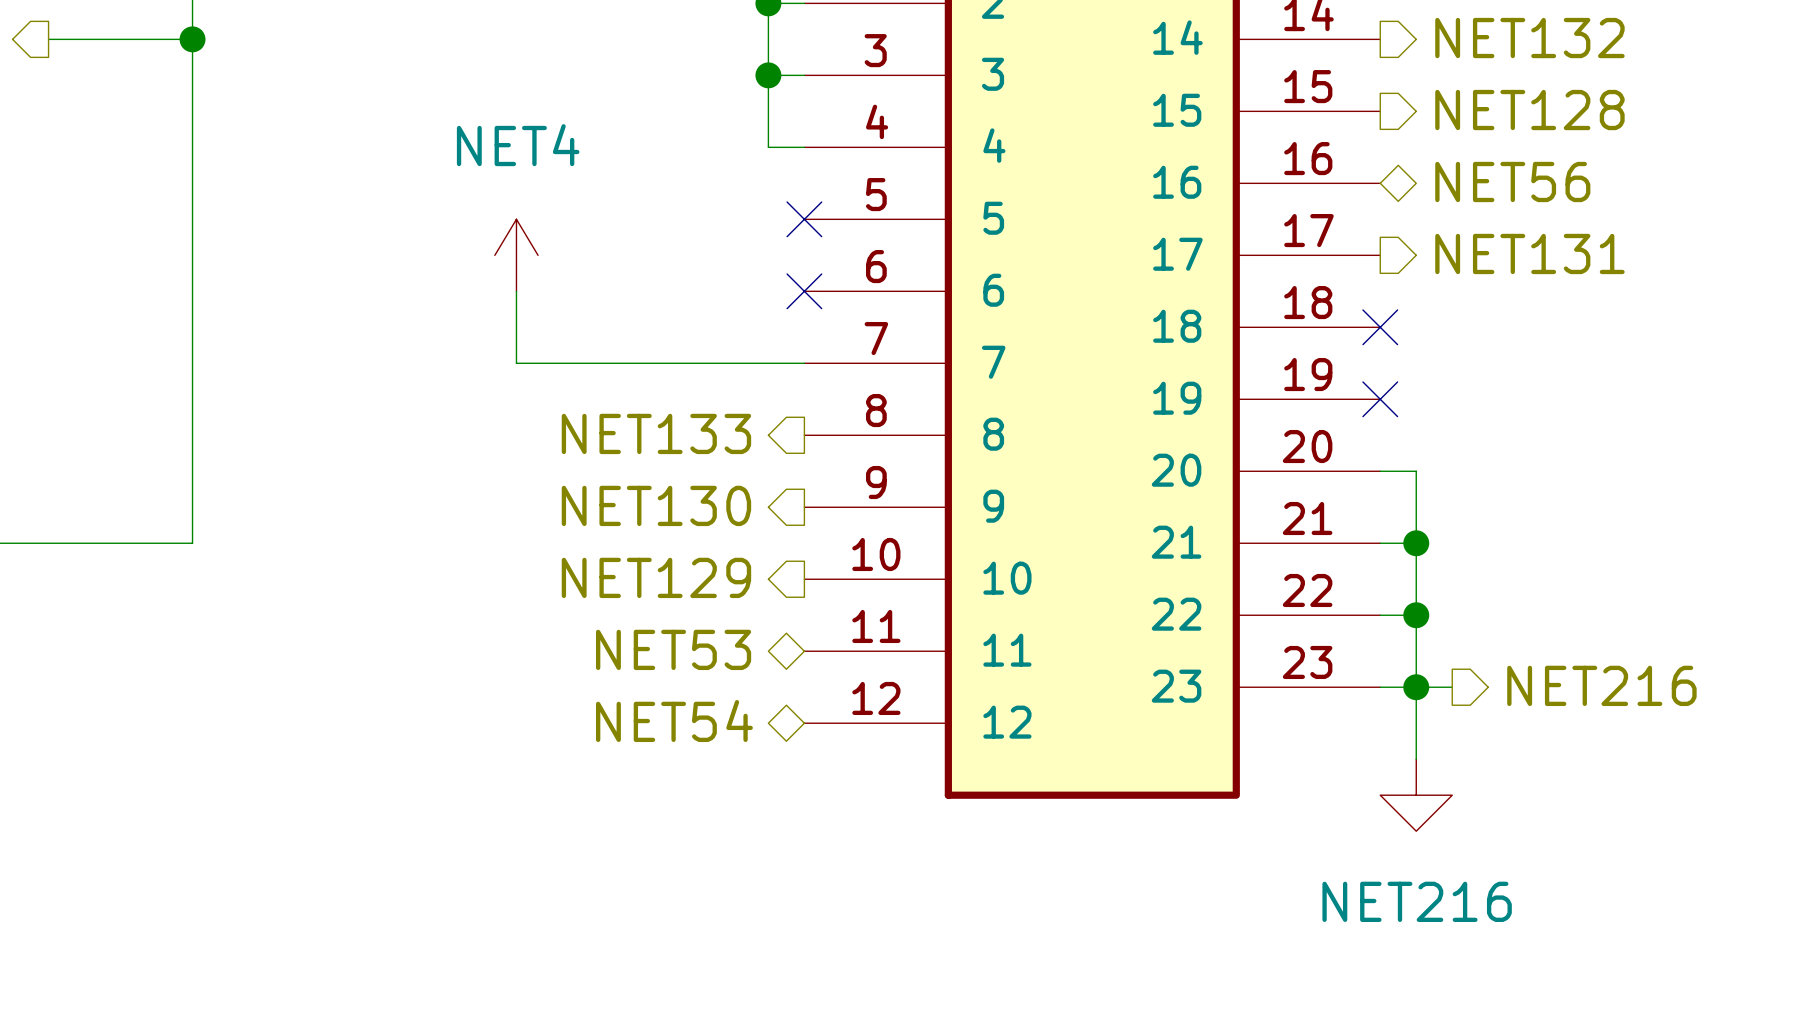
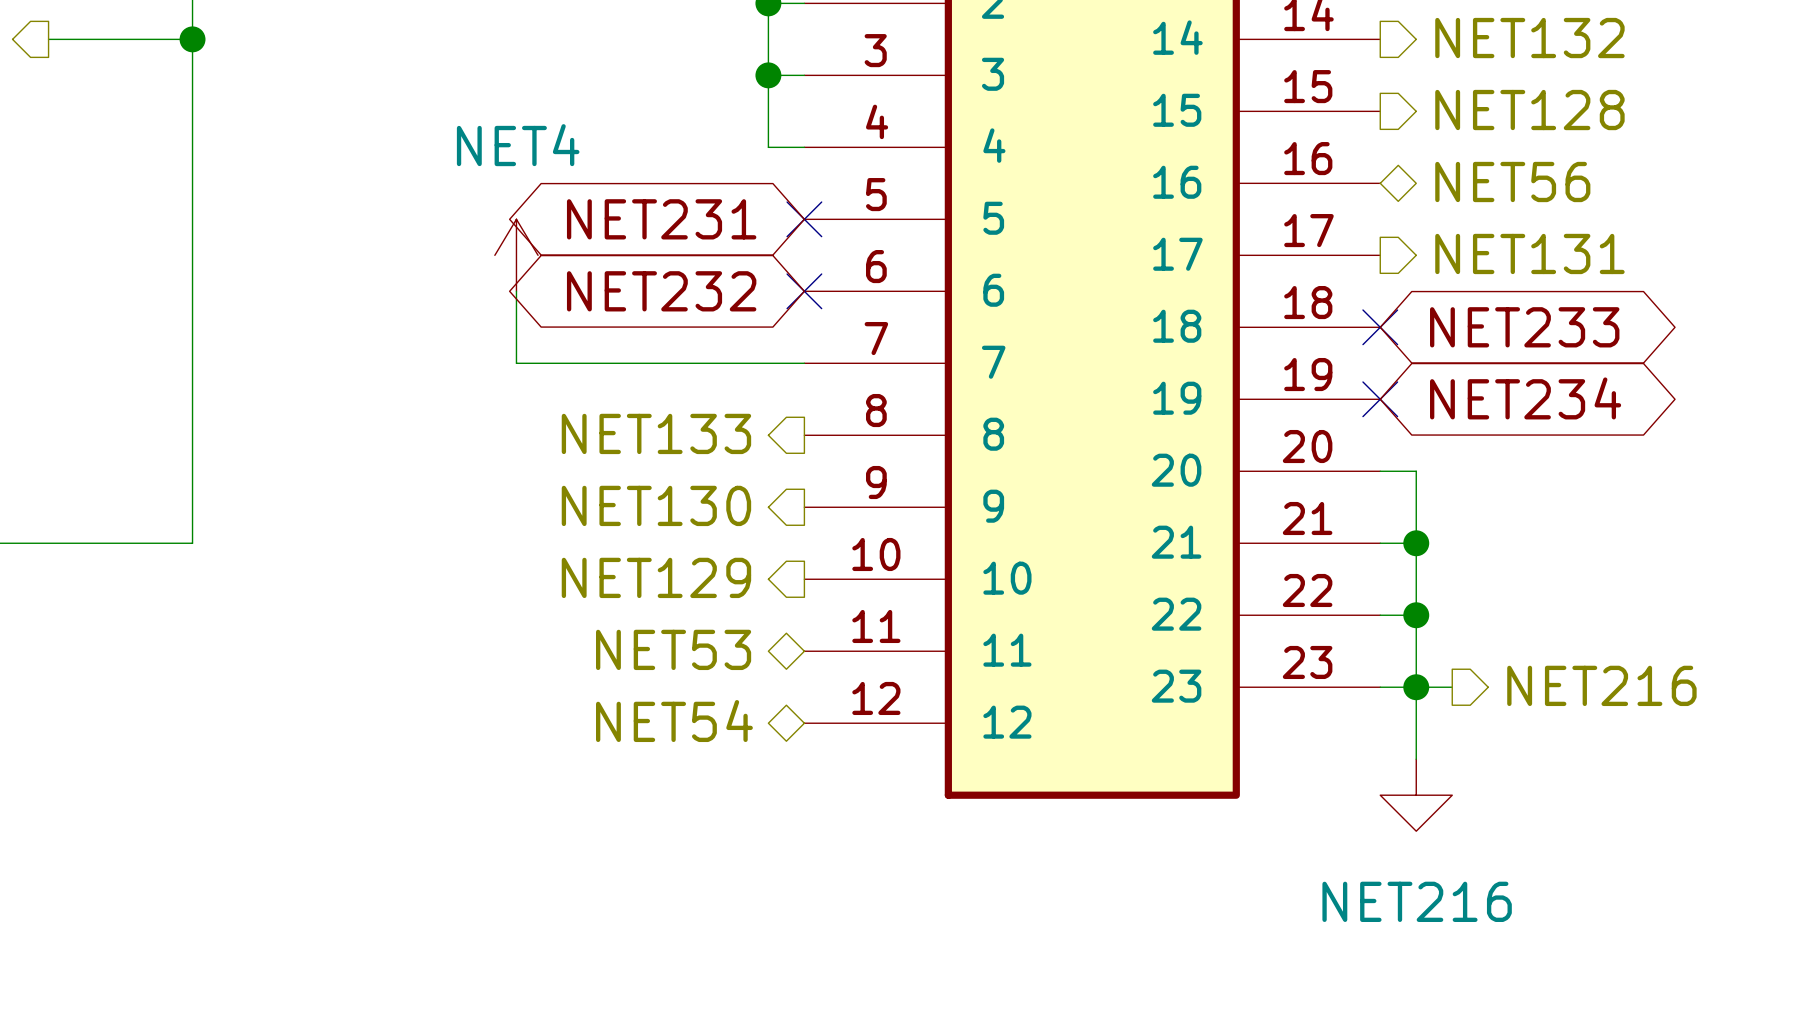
global label: none -> NET231 (661, 219)
global label: none -> NET232 (661, 291)
global label: none -> NET233 (1524, 327)
global label: none -> NET234 (1525, 398)

